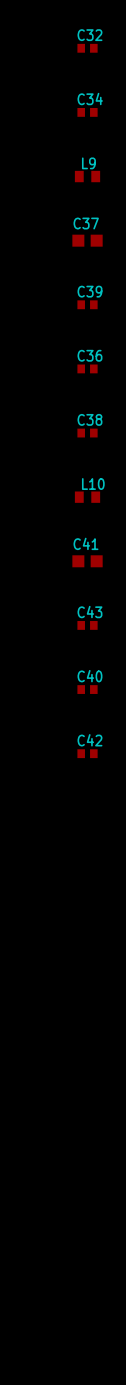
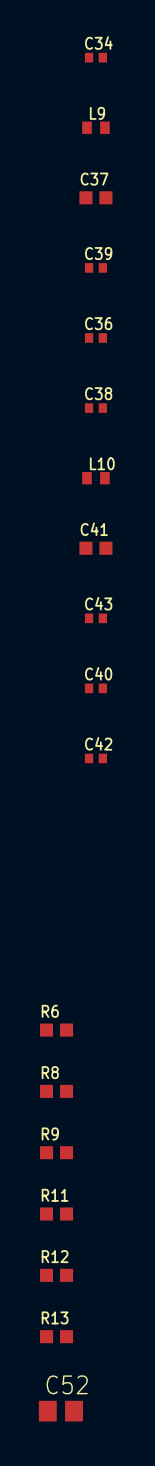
R6: none -> (56, 1030)
R8: none -> (56, 1091)
R9: none -> (56, 1152)
R11: none -> (56, 1214)
R12: none -> (56, 1275)
R13: none -> (56, 1336)
C52: none -> (60, 1411)

